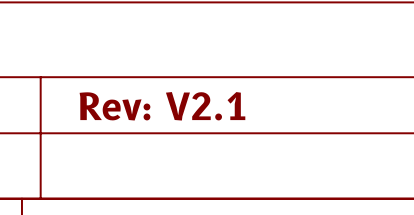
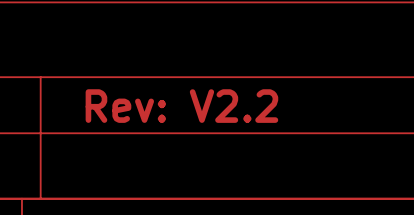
title block: Rev: V2.1 (162, 106) -> Rev: V2.2 (181, 106)

